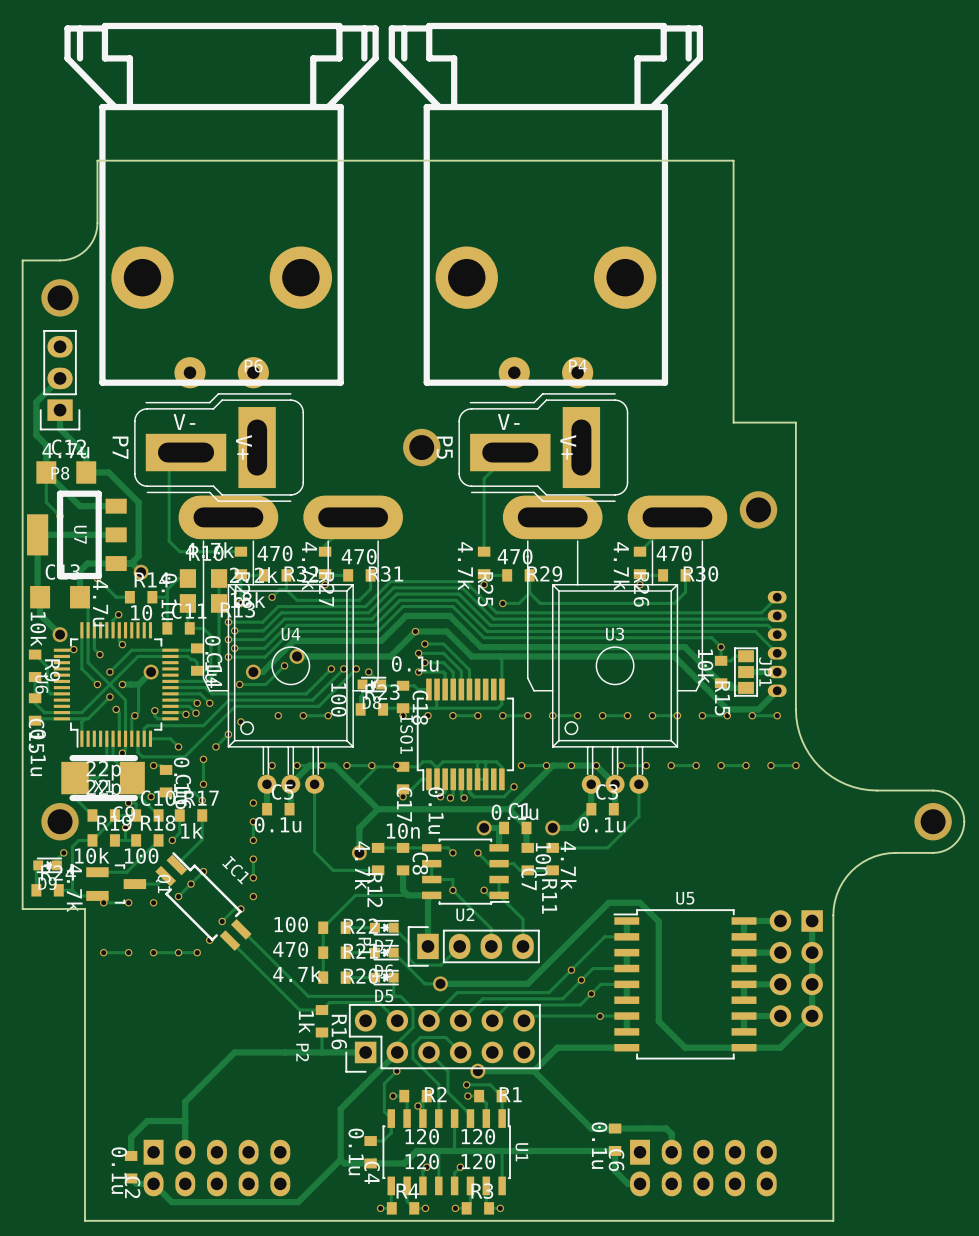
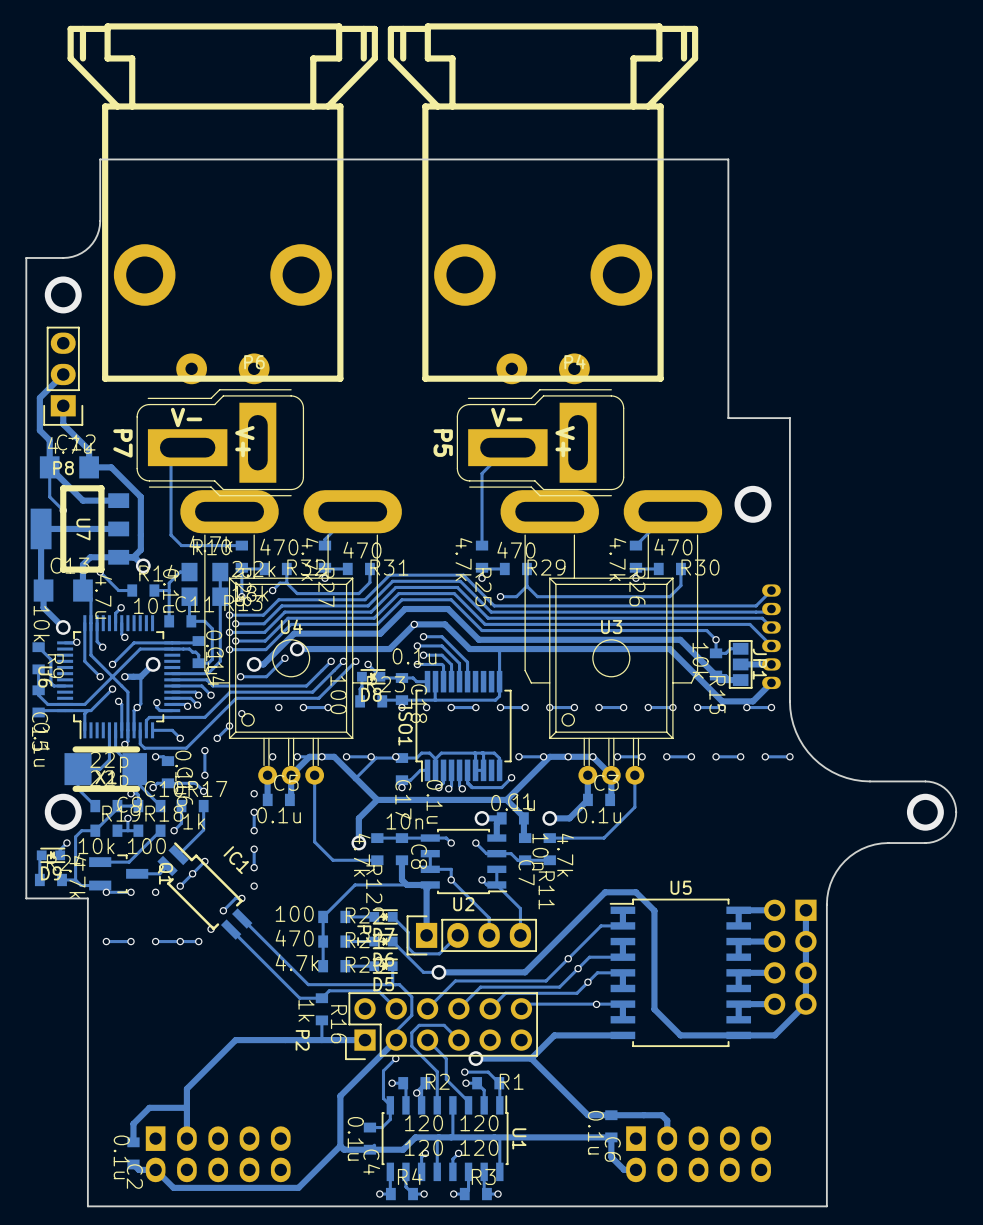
via: (421, 447) -> none

